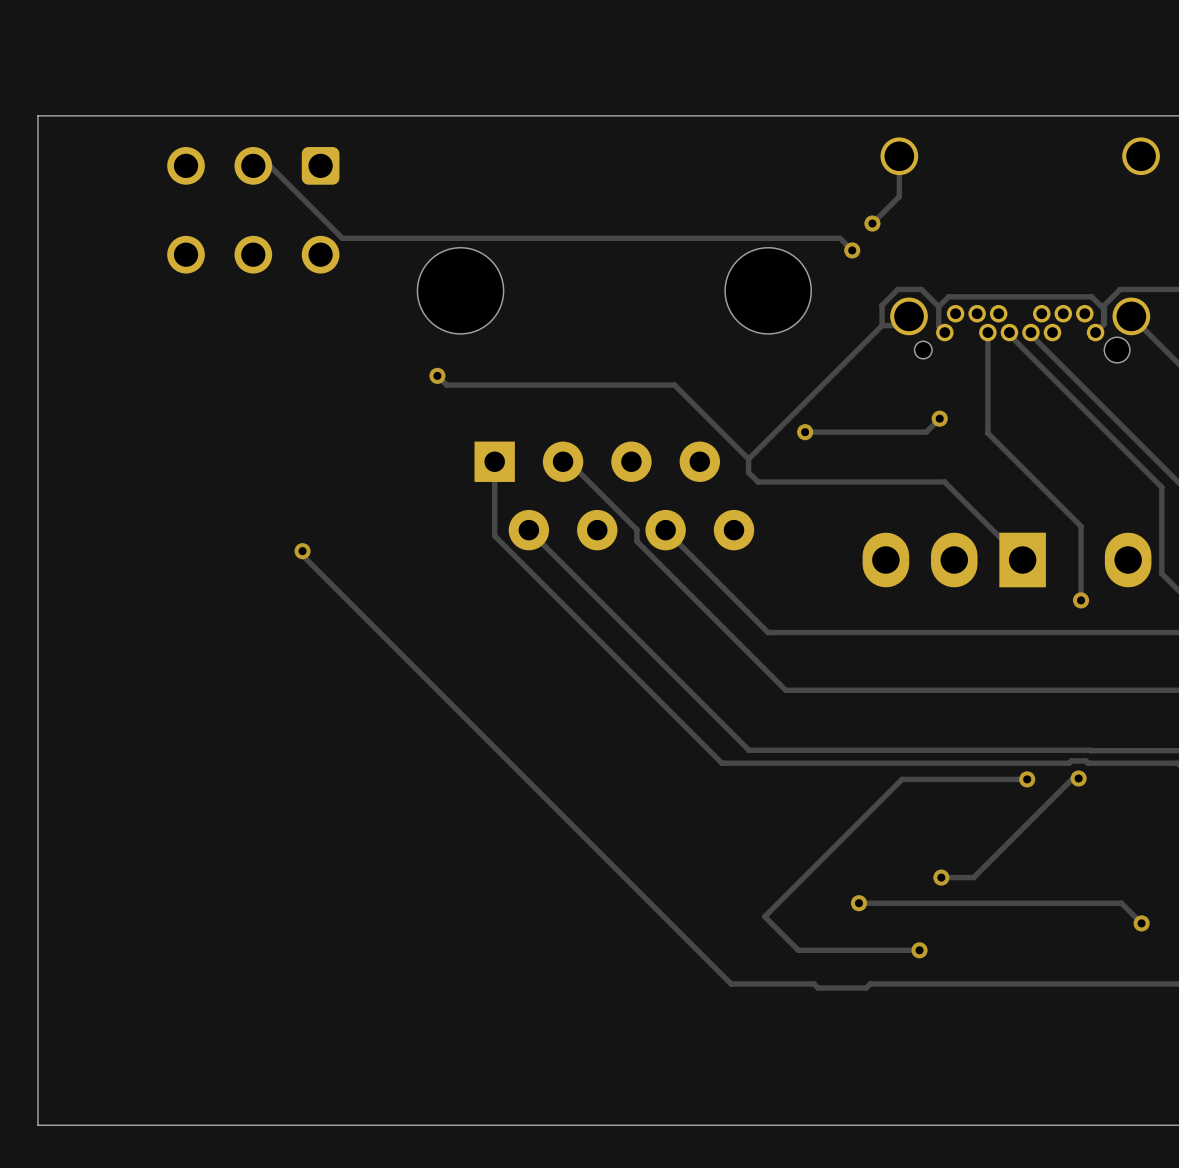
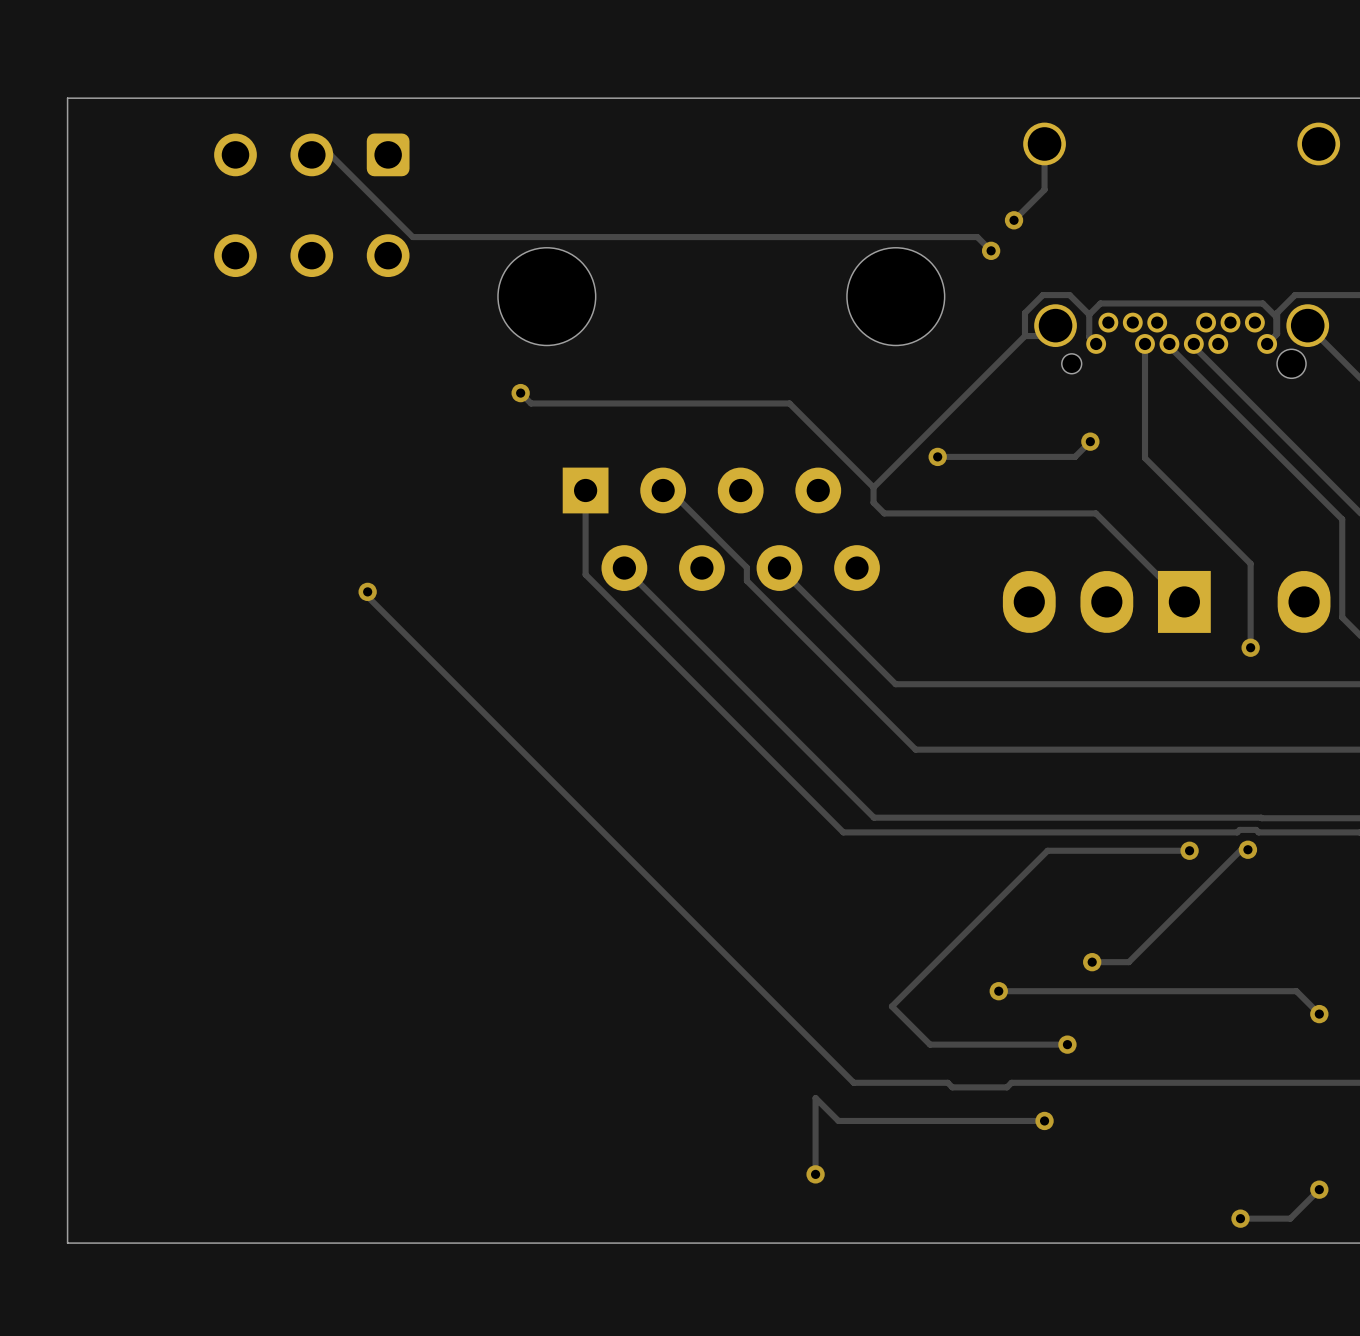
track: none -> (1044, 1120) (838, 1120) (815, 1098) (815, 1174)
via: none -> (1044, 1120)
via: none -> (815, 1174)
track: none -> (1319, 1189) (1290, 1218) (1240, 1218)
via: none -> (1319, 1189)
via: none -> (1240, 1218)

